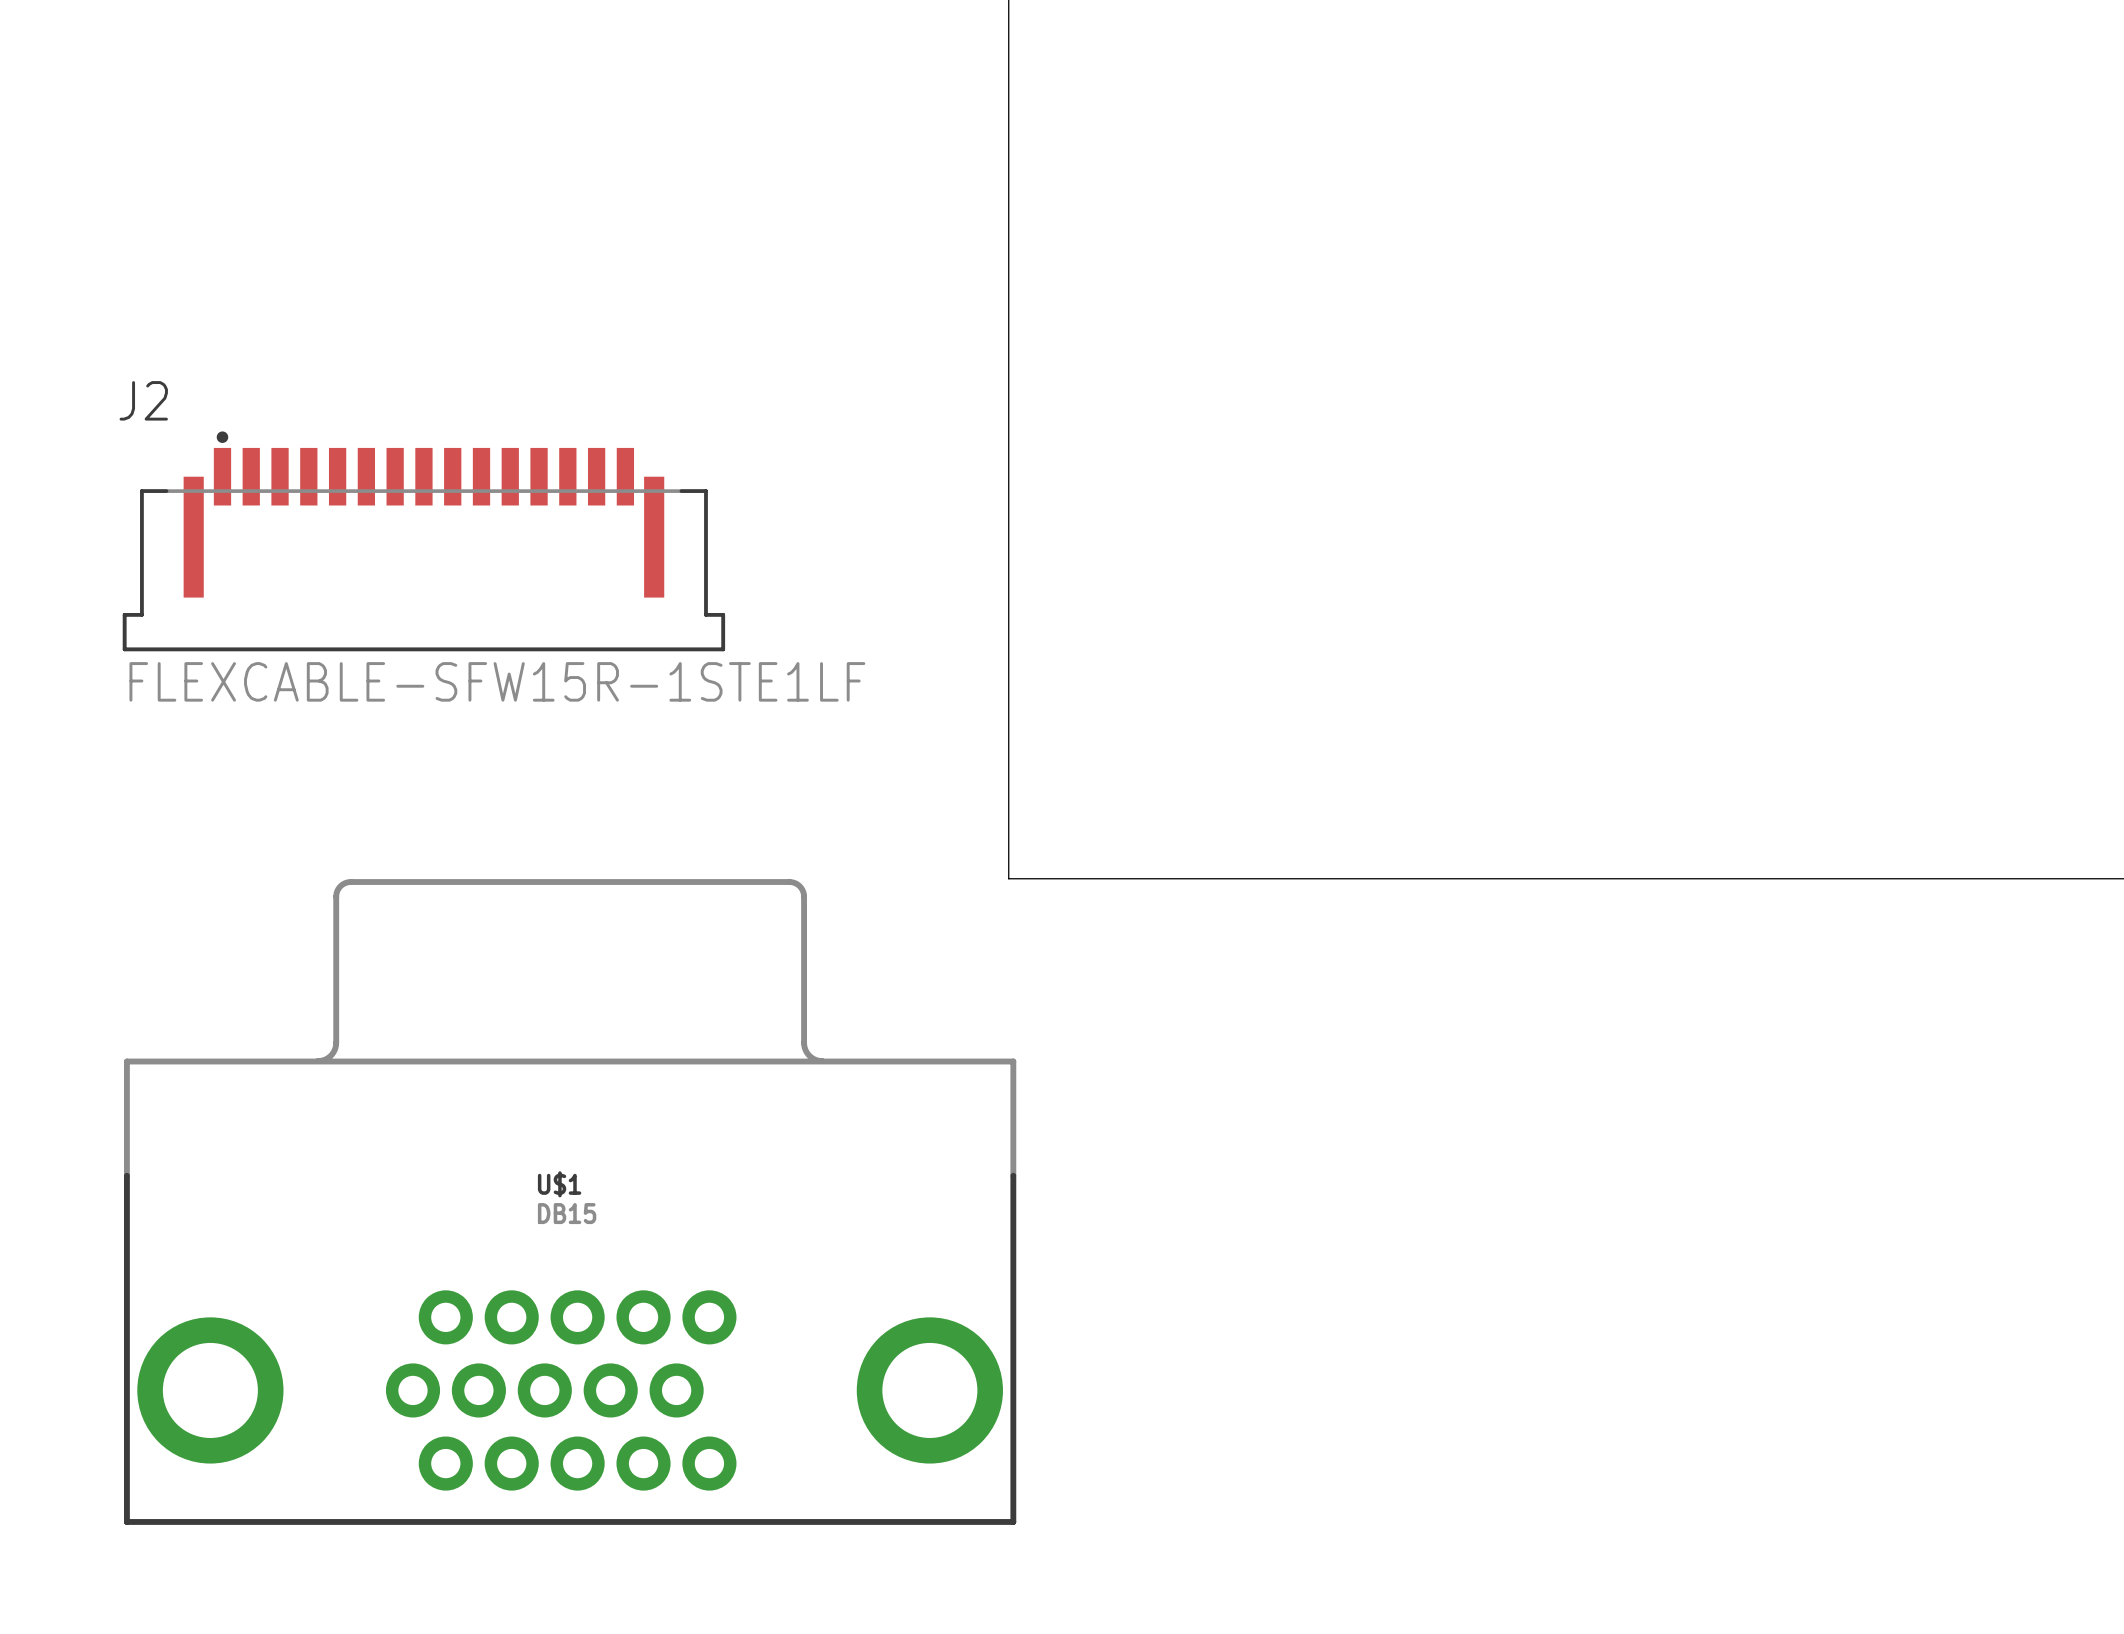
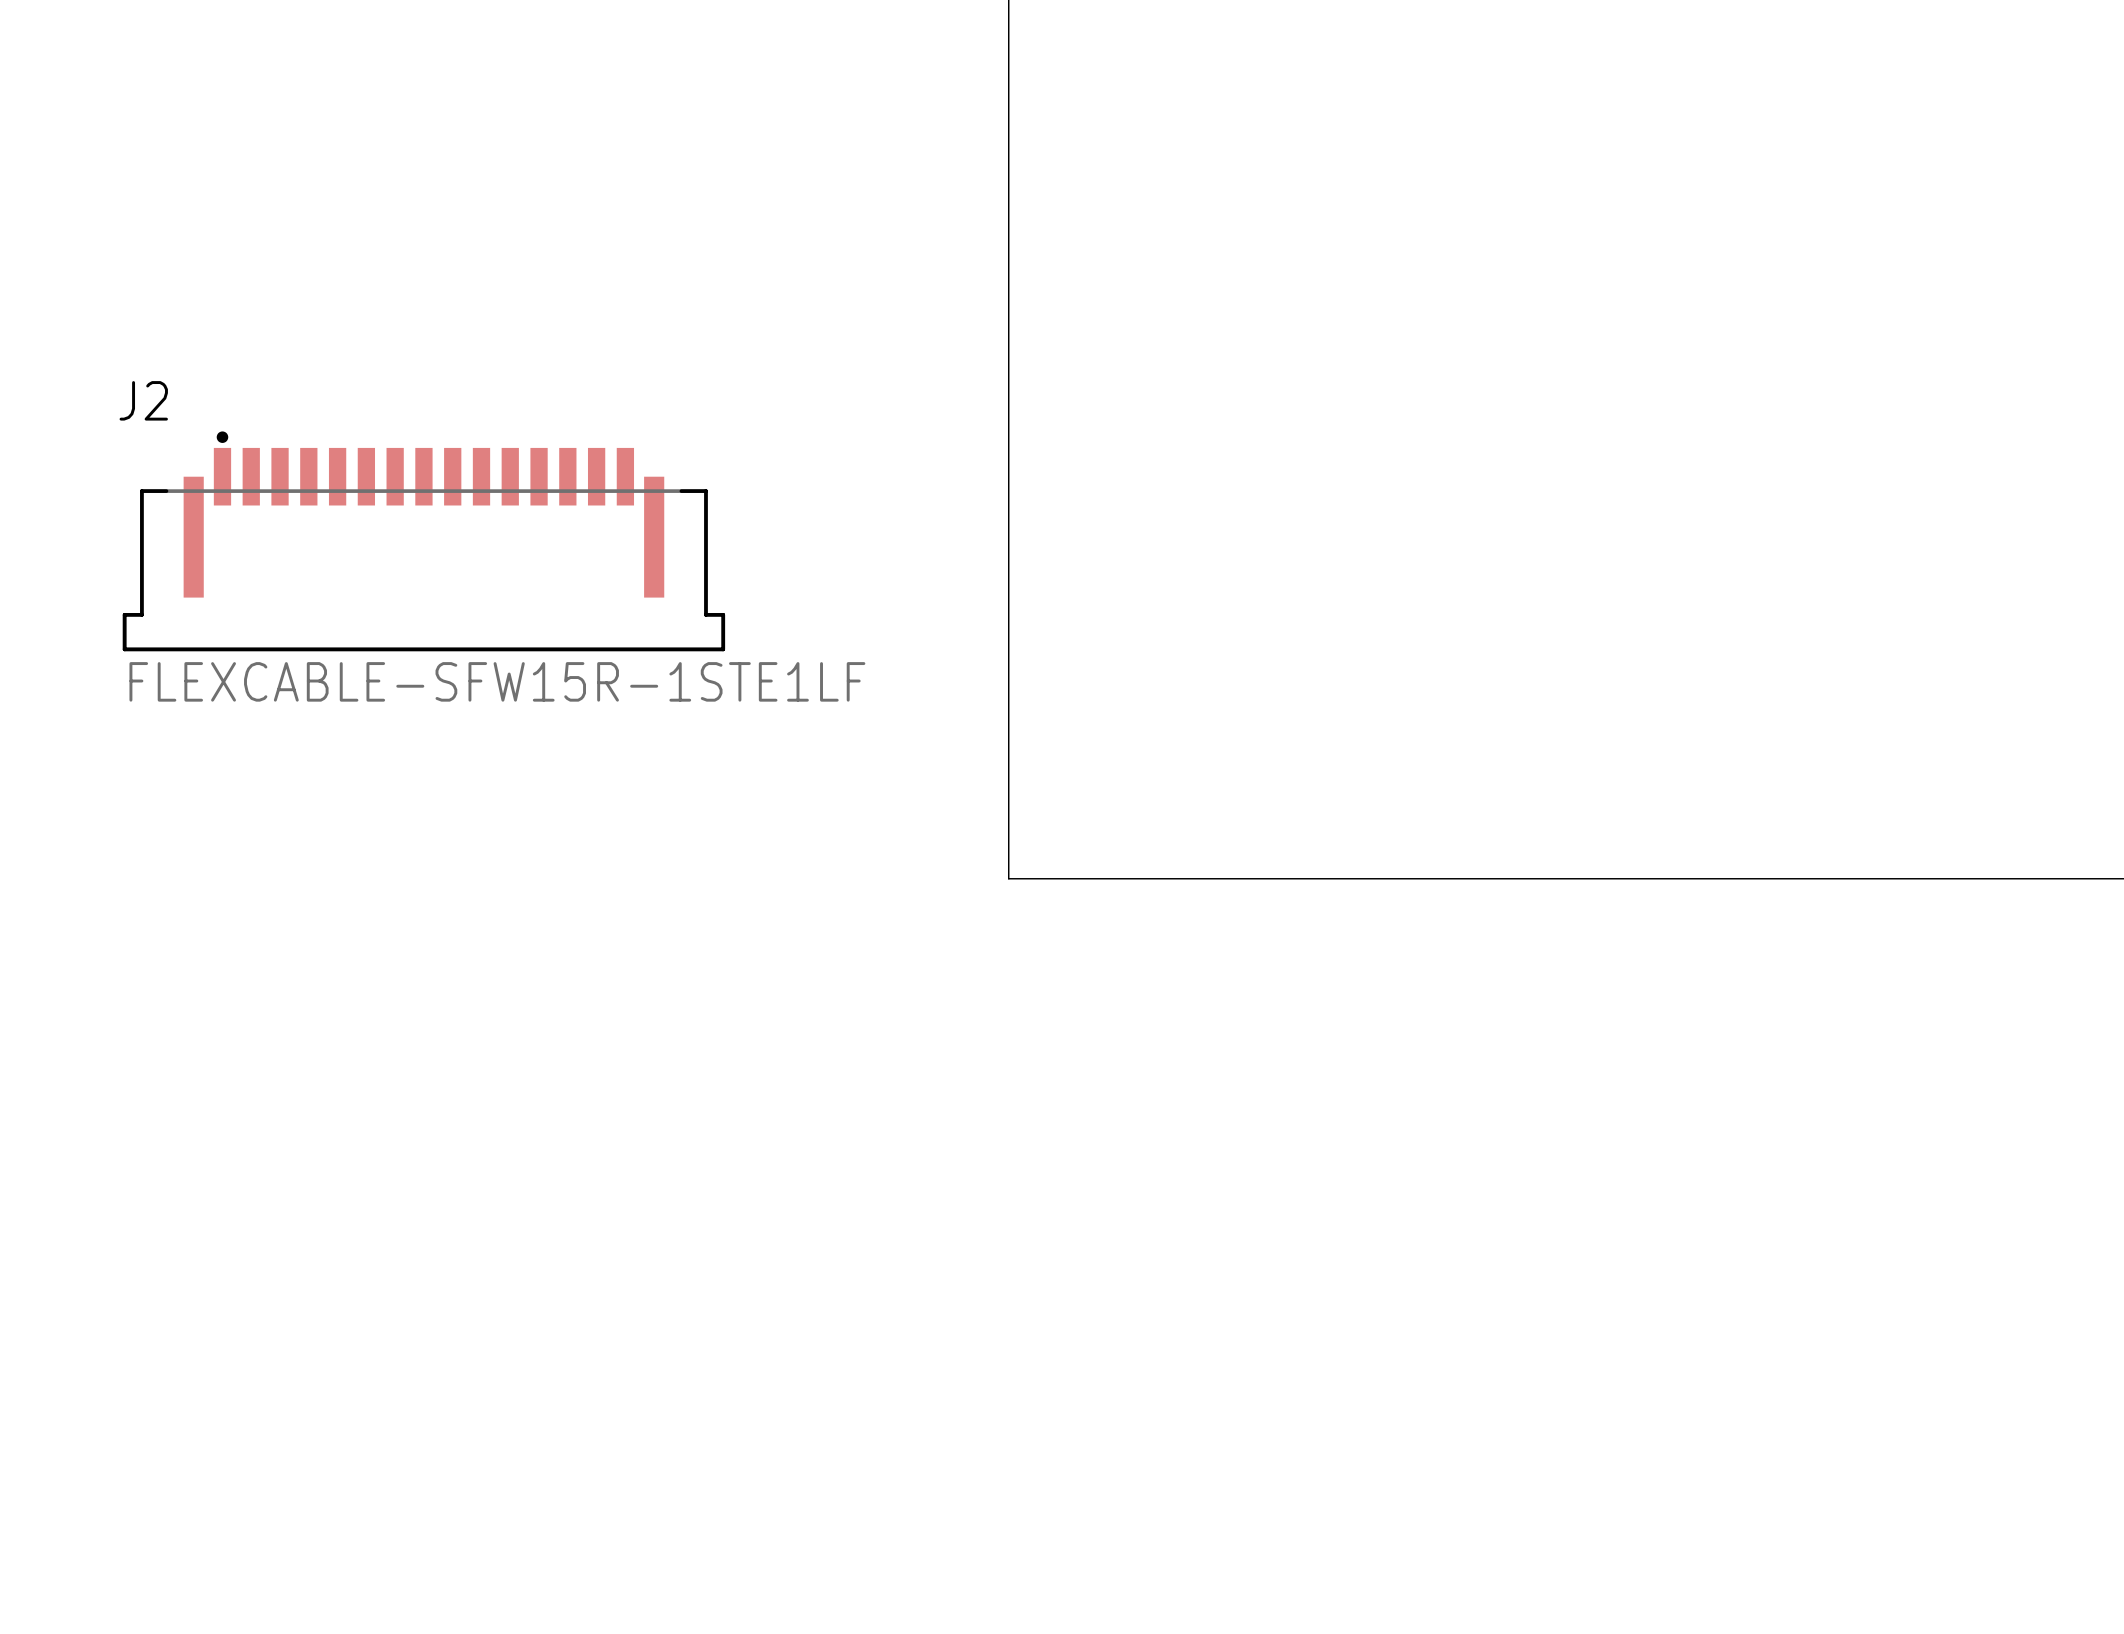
U$1: DB15 (570, 1201) -> none

